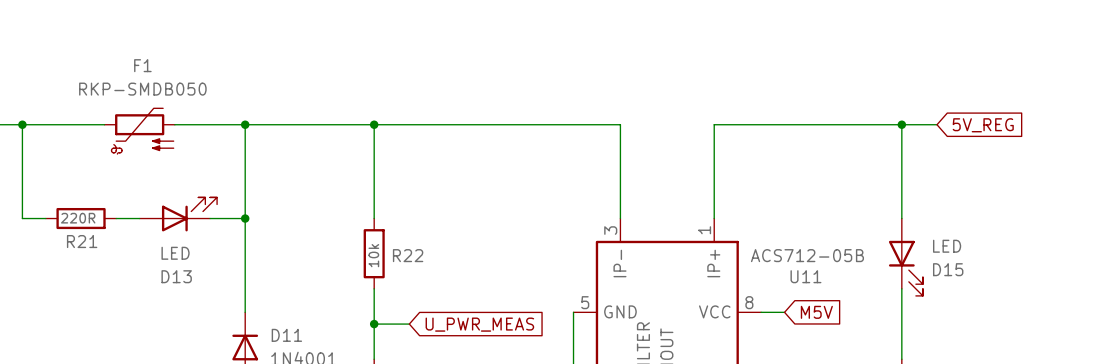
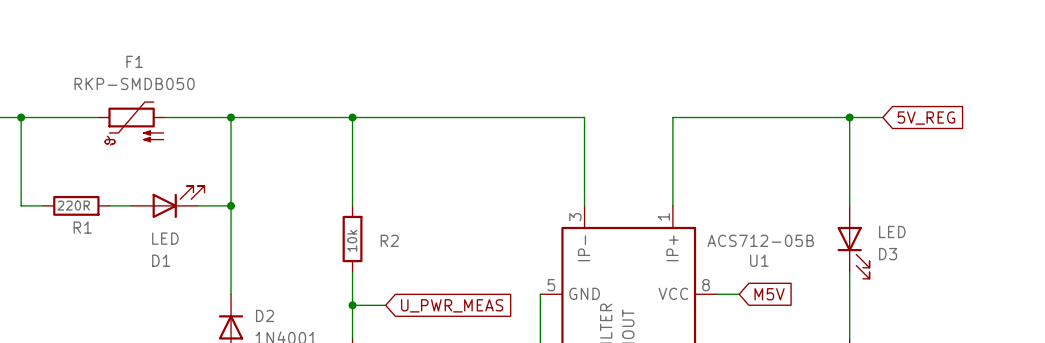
R21 name: R21 (82, 241) -> R1 (82, 227)
R22 name: R22 (408, 255) -> R2 (389, 240)
D15 name: D15 (948, 269) -> D3 (888, 254)
D13 name: D13 (176, 276) -> D1 (161, 260)
U11 name: U11 (805, 276) -> U1 (759, 260)
D11 name: D11 (286, 335) -> D2 (265, 315)

